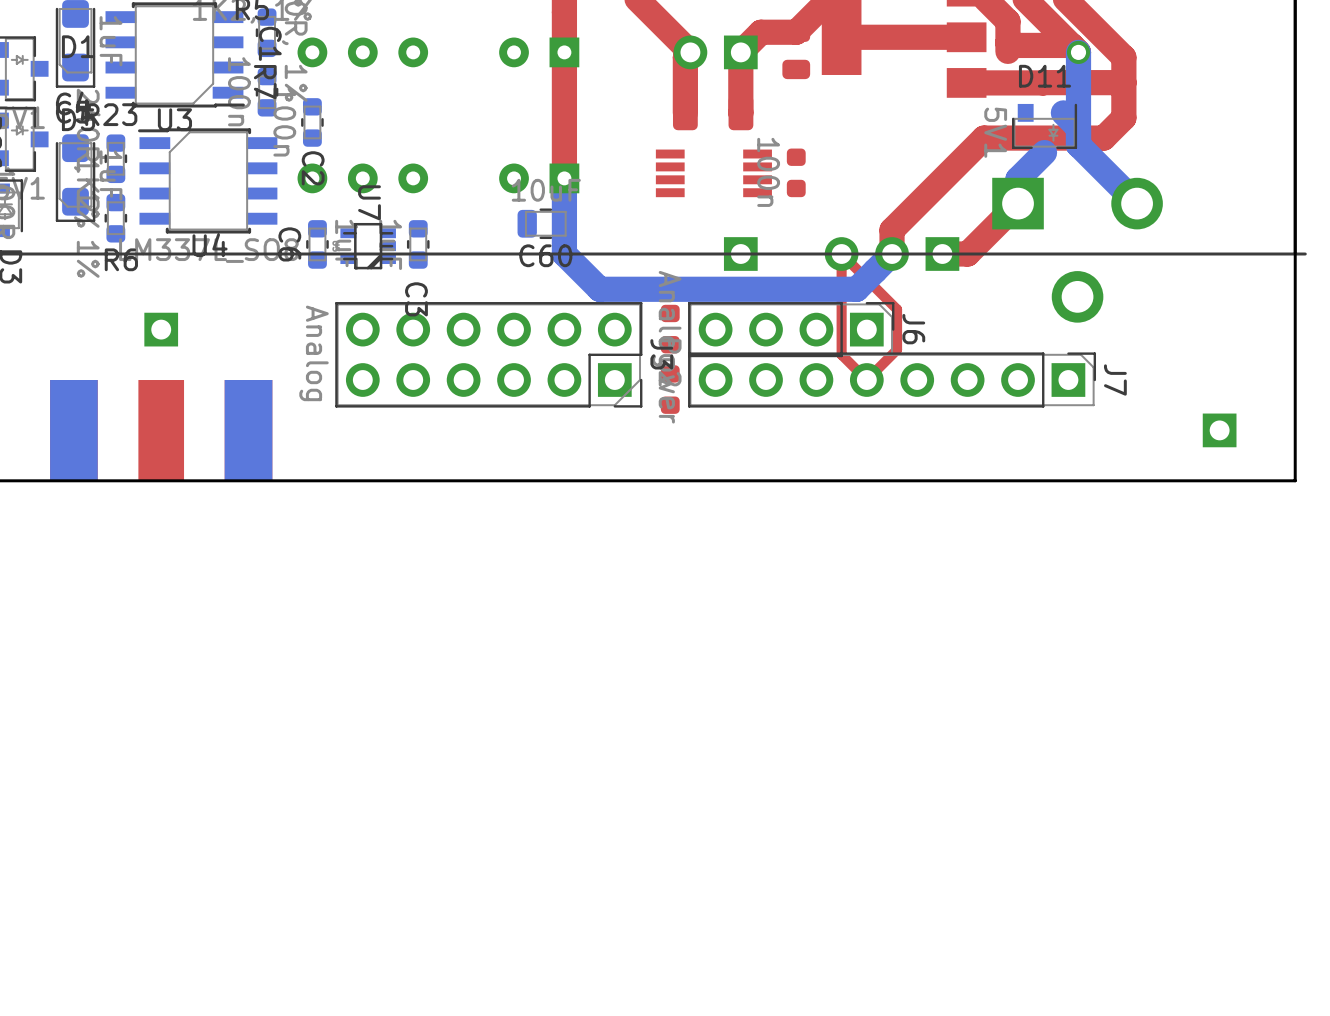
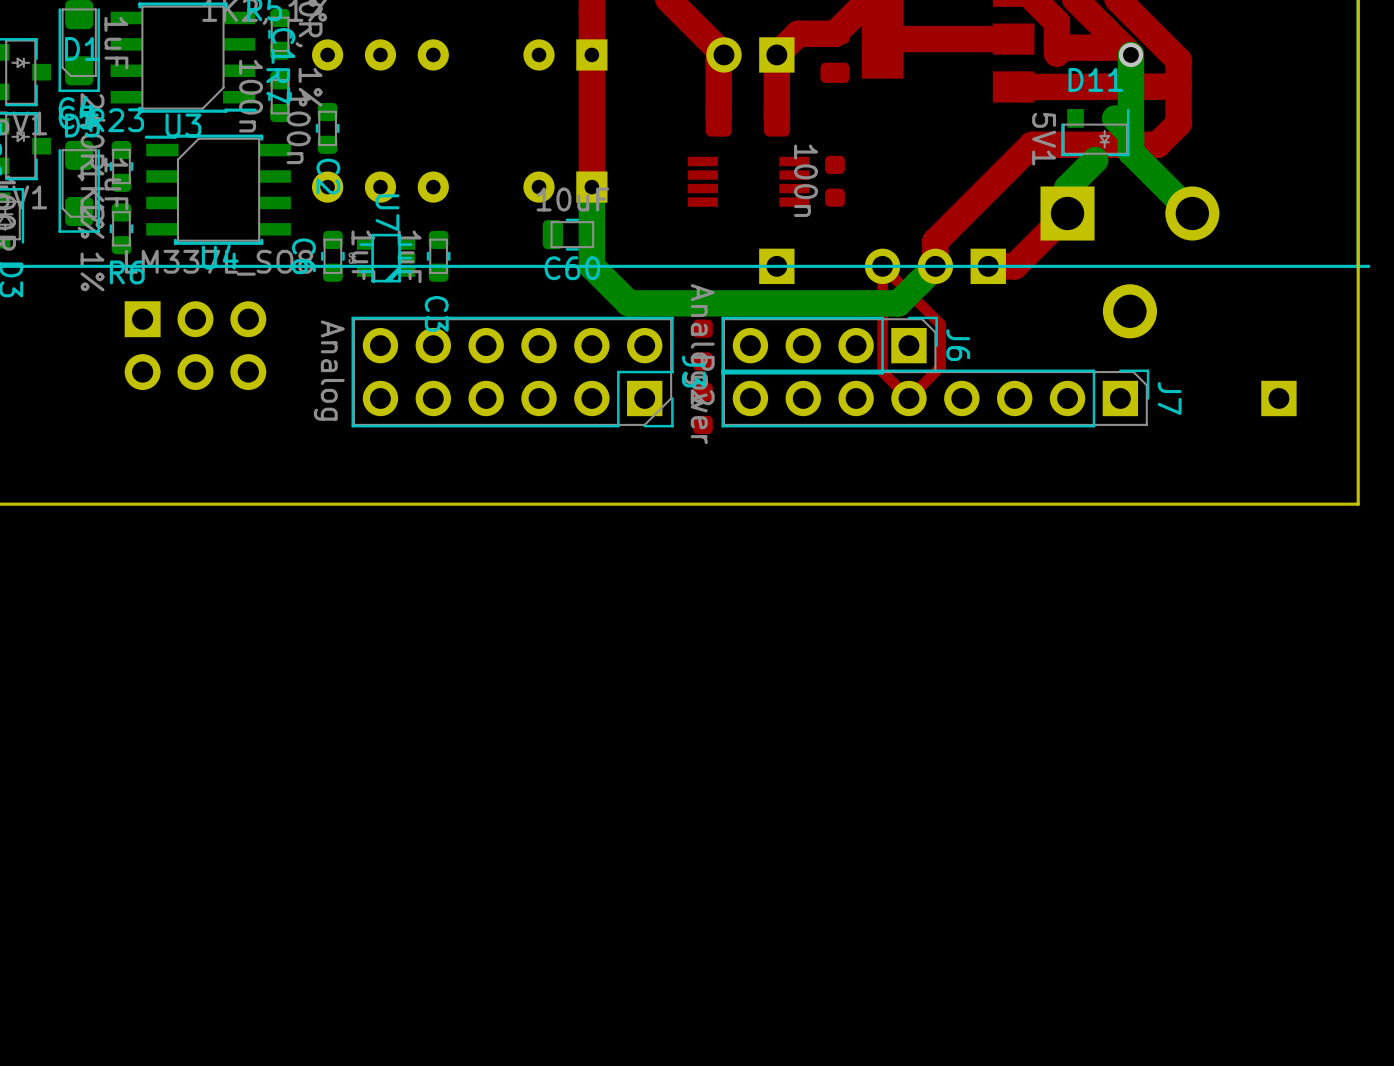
part: (161, 329) -> none
part: none -> (195, 345)
part: (161, 430) -> none
part position: (1219, 430) -> (1278, 398)

